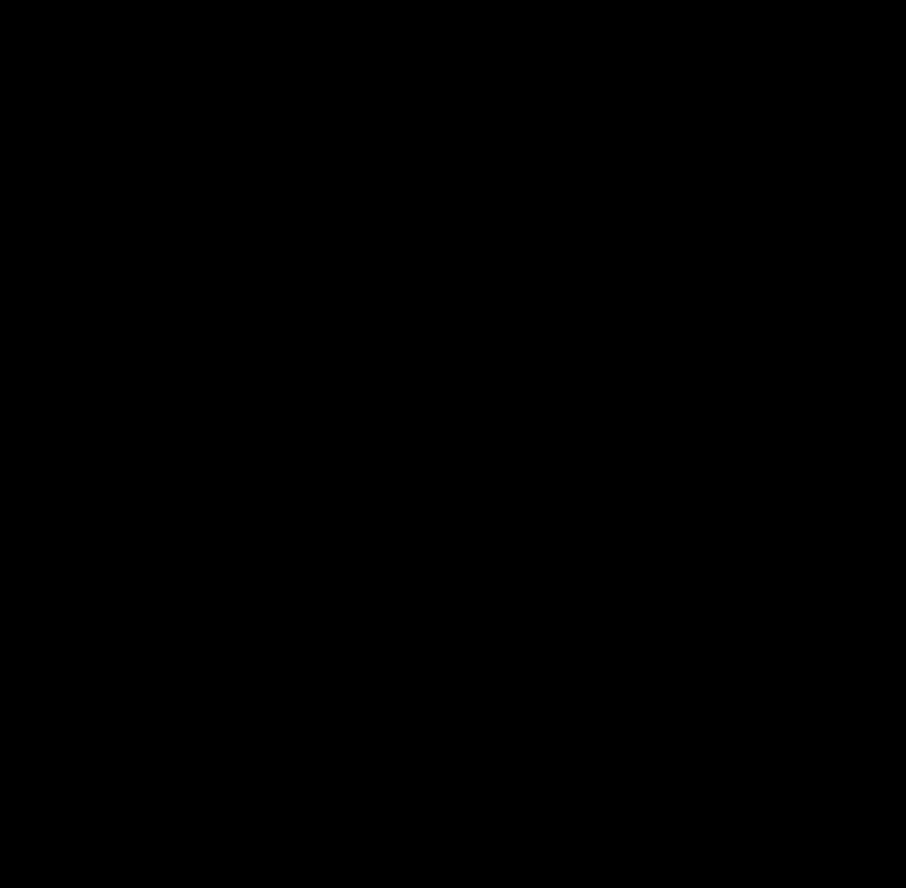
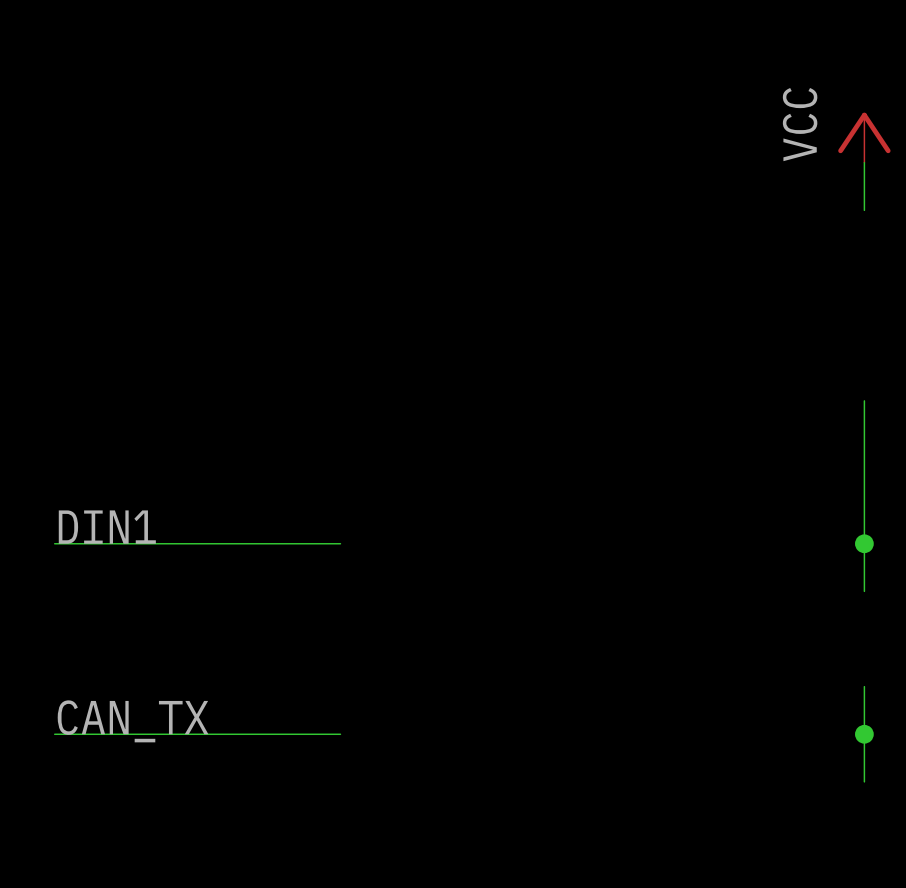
power symbol: none -> VCC (864, 137)
wire: none -> (864, 162) (864, 210)
wire: none -> (864, 400) (864, 591)
label: none -> DIN1 (107, 527)
wire: none -> (54, 543) (340, 543)
junction: none -> (864, 543)
wire: none -> (864, 686) (864, 781)
label: none -> CAN_TX (133, 721)
wire: none -> (54, 734) (340, 734)
junction: none -> (864, 734)

